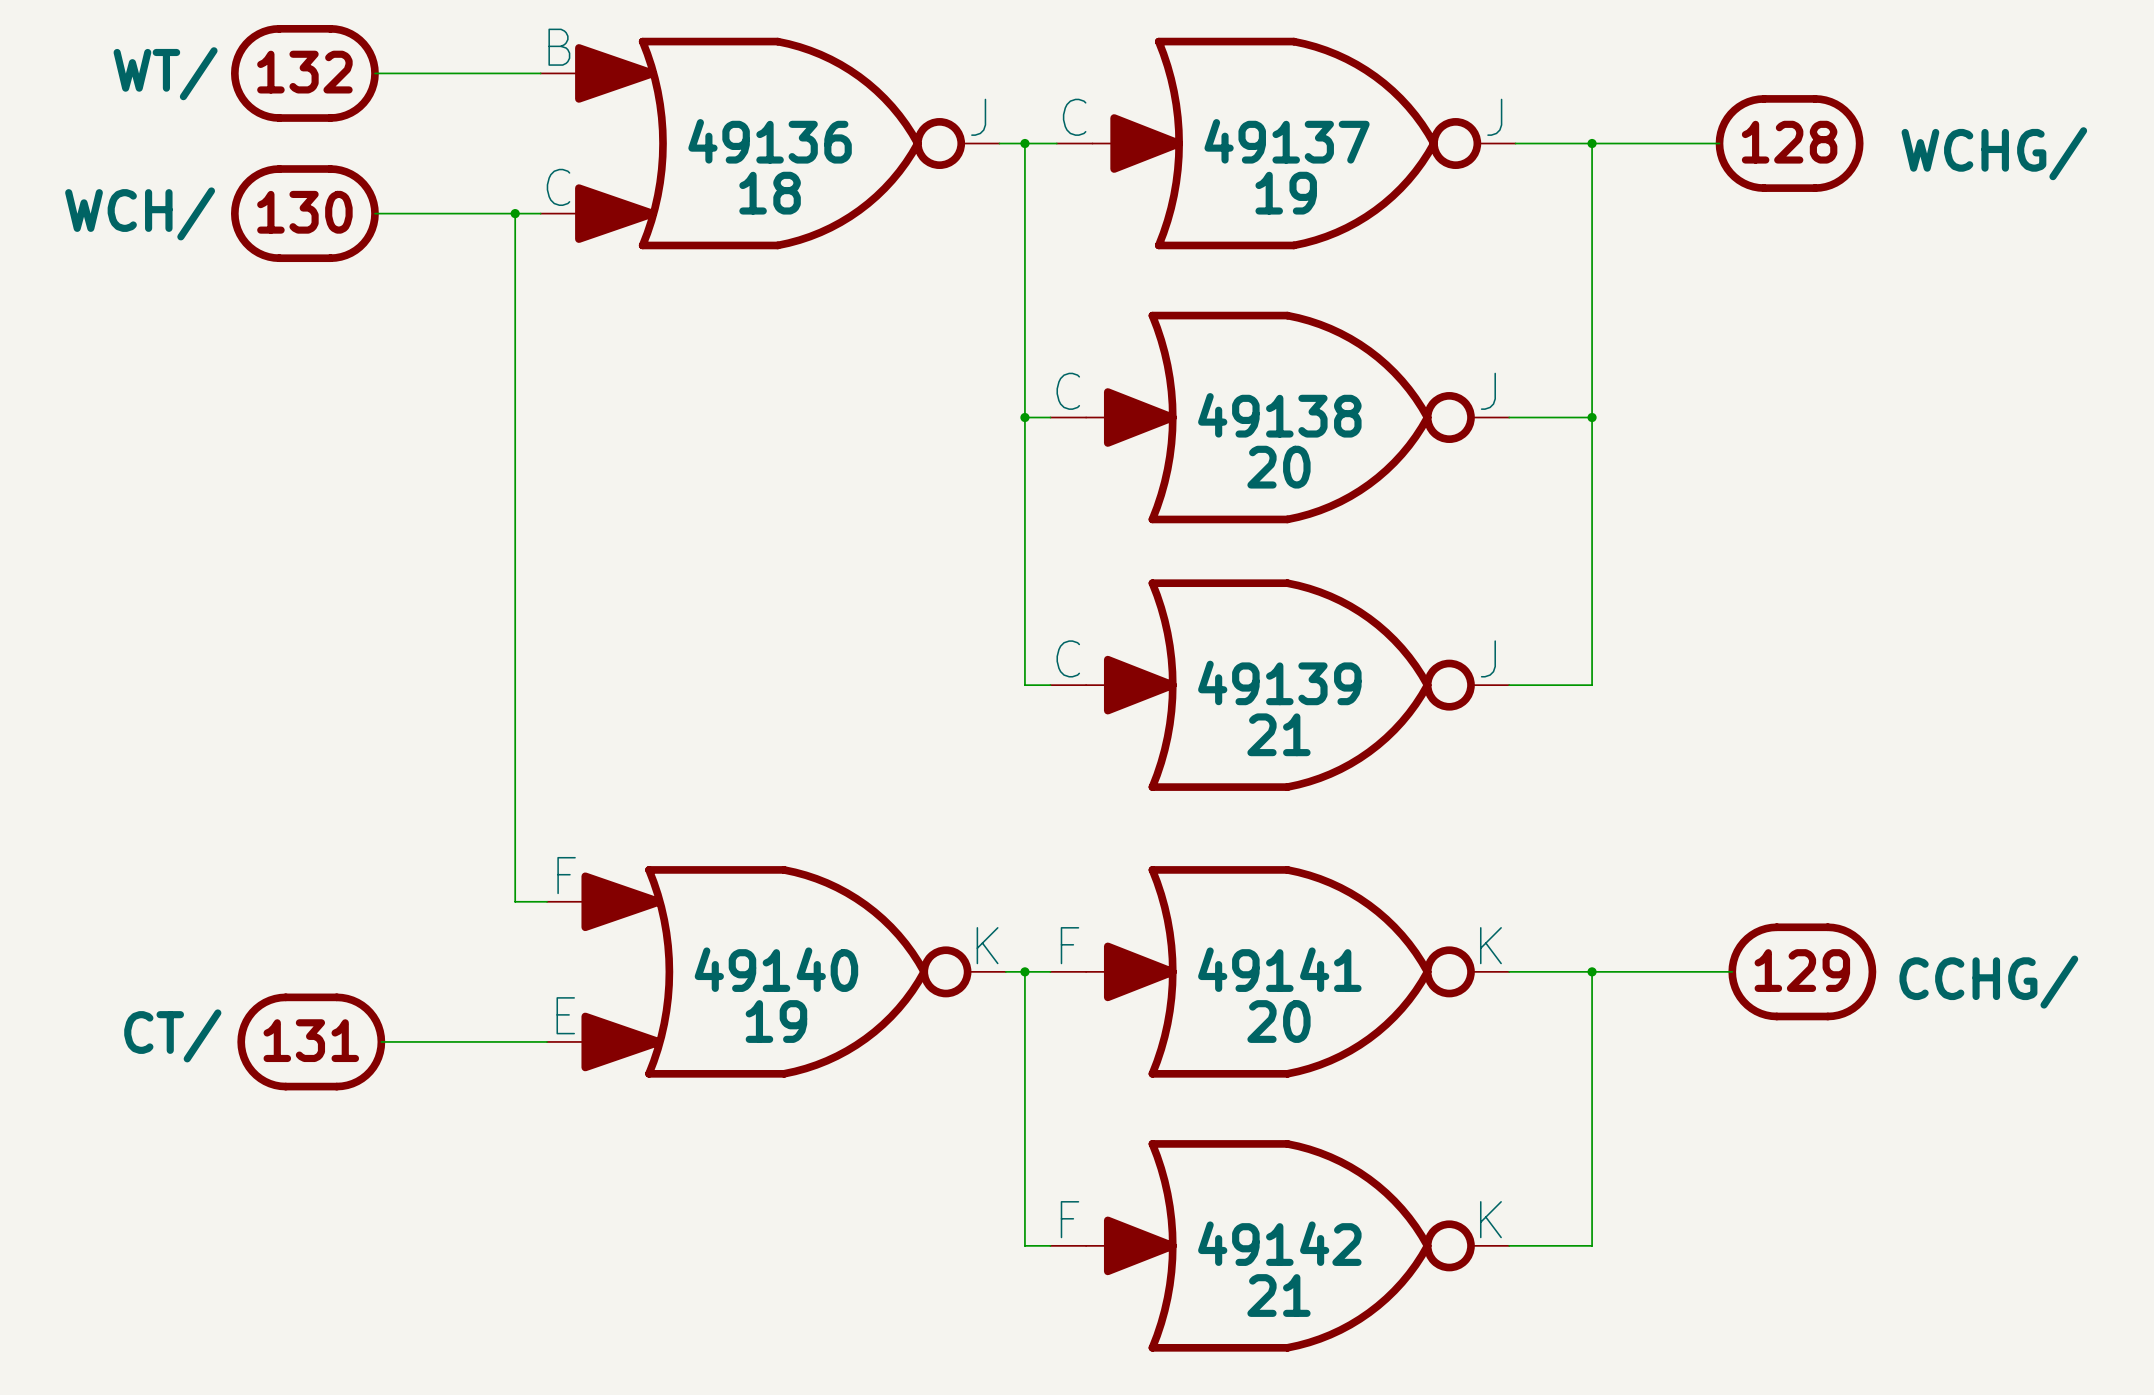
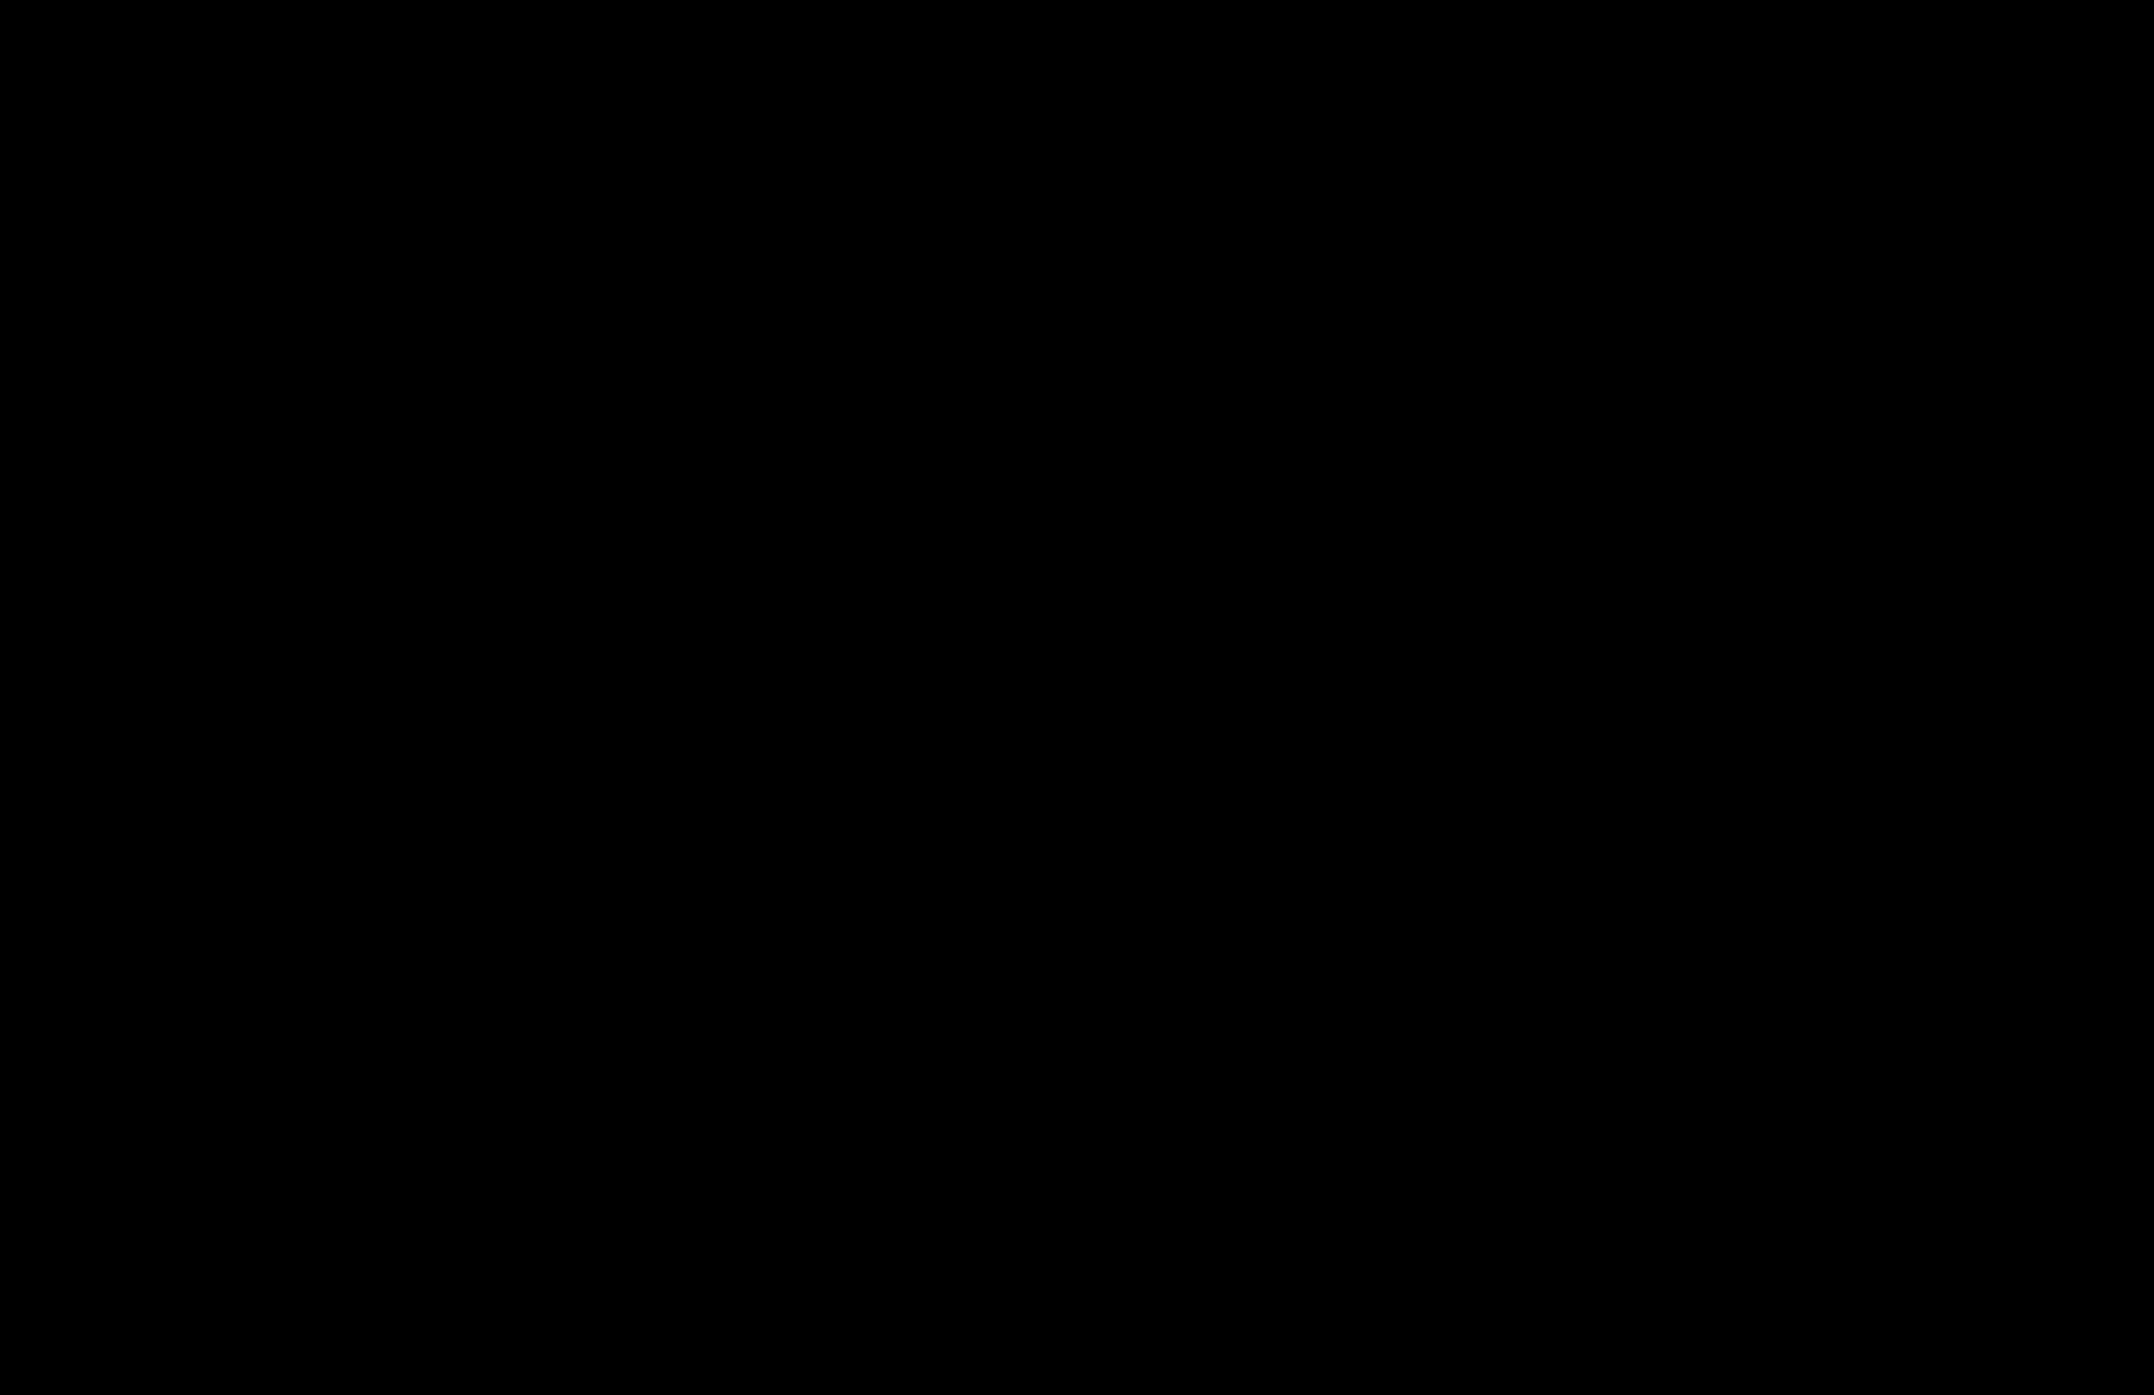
part: (304, 73) -> none
wire: (375, 73) (540, 73) -> none
part: (770, 143) -> none
wire: (999, 143) (1056, 143) -> none
wire: (1024, 143) (1024, 685) (1050, 685) -> none
junction: (1024, 143) -> none
part: (1286, 143) -> none
wire: (1515, 143) (1719, 143) -> none
wire: (1592, 143) (1592, 685) (1509, 685) -> none
junction: (1592, 143) -> none
part: (1789, 143) -> none
part: (304, 213) -> none
wire: (375, 213) (540, 213) -> none
wire: (515, 213) (515, 901) (547, 901) -> none
junction: (515, 213) -> none
wire: (1024, 417) (1050, 417) -> none
junction: (1024, 417) -> none
part: (1279, 417) -> none
wire: (1509, 417) (1592, 417) -> none
junction: (1592, 417) -> none
part: (1279, 685) -> none
part: (776, 971) -> none
wire: (1005, 971) (1050, 971) -> none
wire: (1024, 971) (1024, 1245) (1050, 1245) -> none
junction: (1024, 971) -> none
part: (1279, 971) -> none
wire: (1509, 971) (1732, 971) -> none
wire: (1592, 971) (1592, 1245) (1509, 1245) -> none
junction: (1592, 971) -> none
part: (1802, 971) -> none
part: (311, 1041) -> none
wire: (381, 1041) (547, 1041) -> none
part: (1279, 1245) -> none

